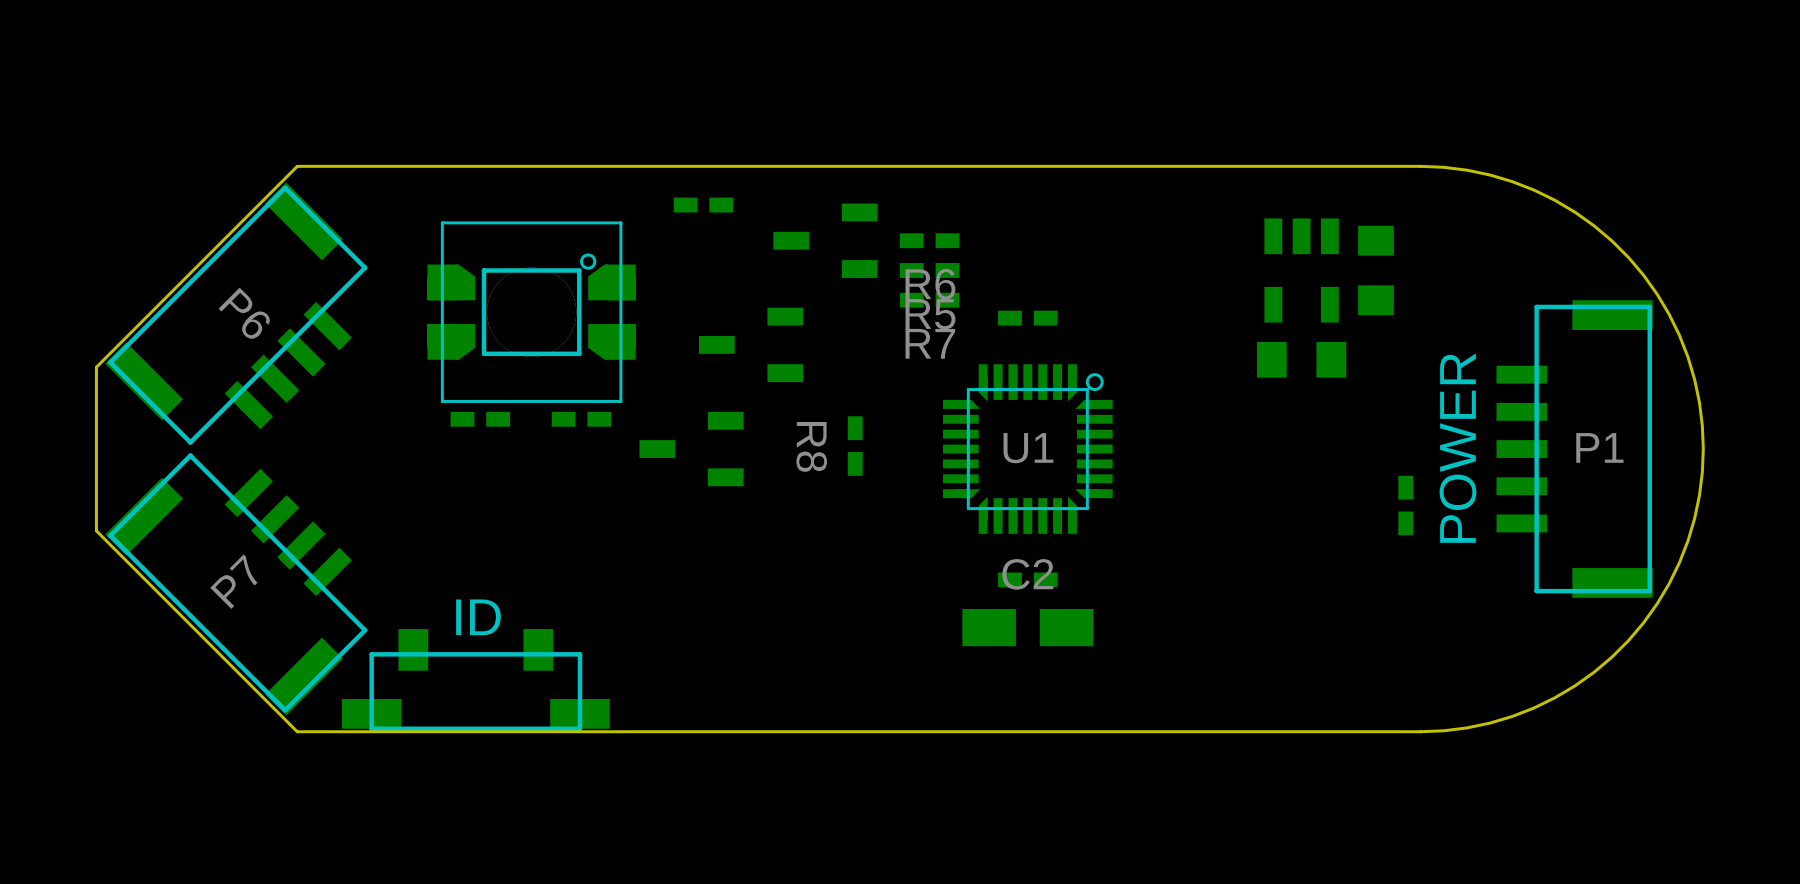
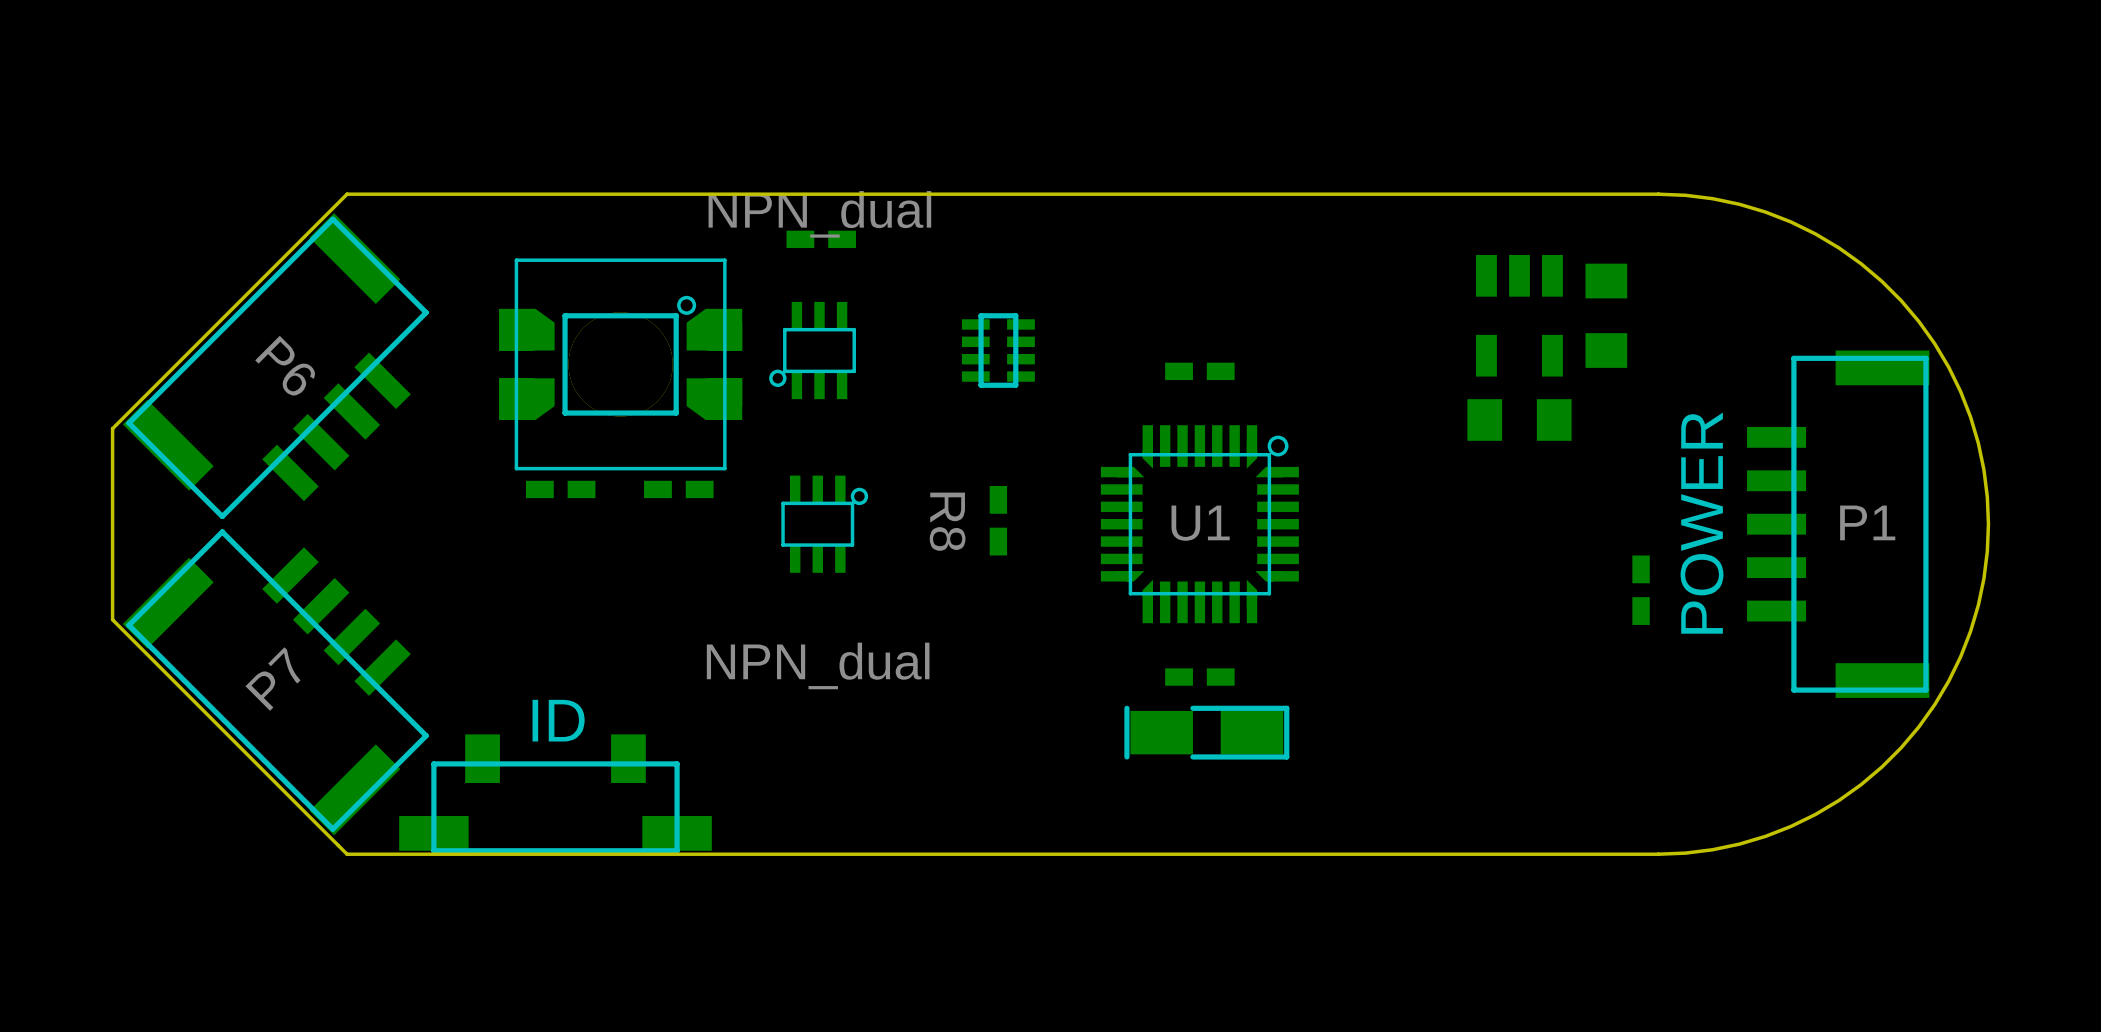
part: (825, 240) -> none
R6: (929, 240) -> none
R5: (929, 270) -> none
part: none -> NPN_dual (812, 350)
part: none -> (998, 350)
R7: (929, 300) -> none
part: (751, 344) -> none
part footprint: [639, 411, 744, 487] -> [781, 475, 869, 573]
part value: none -> NPN_dual (818, 665)
C2: (1027, 627) -> none
part: none -> (1206, 732)

